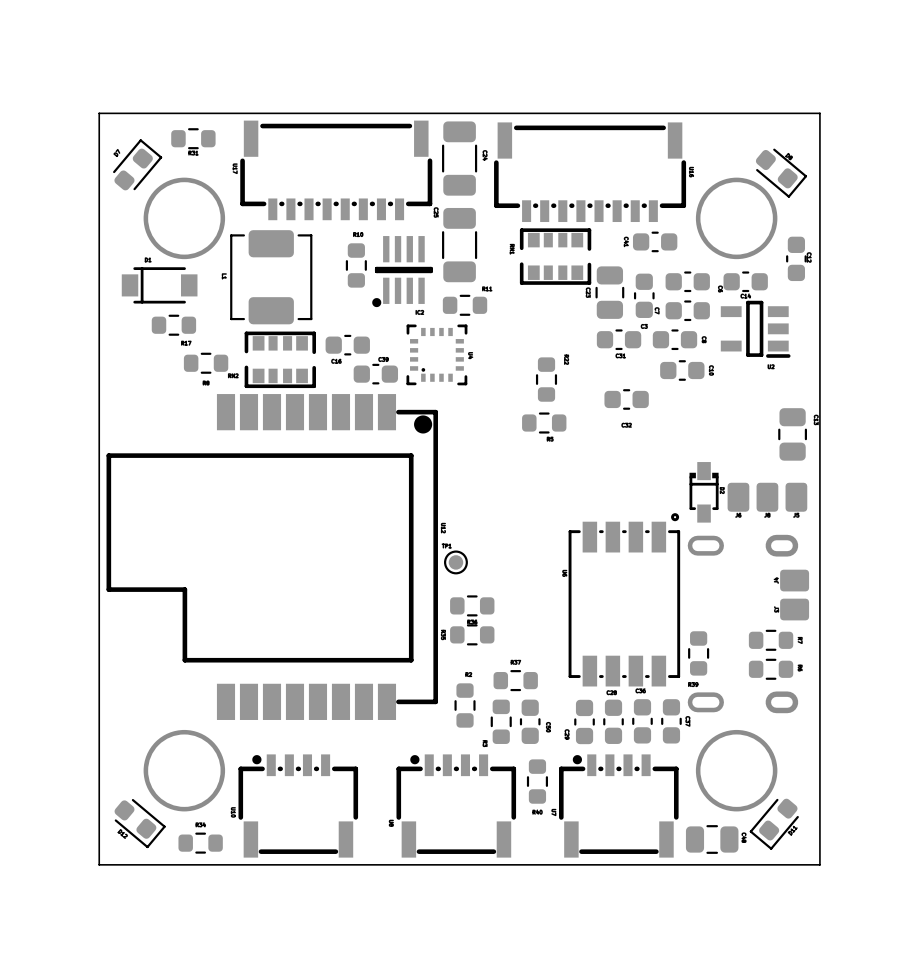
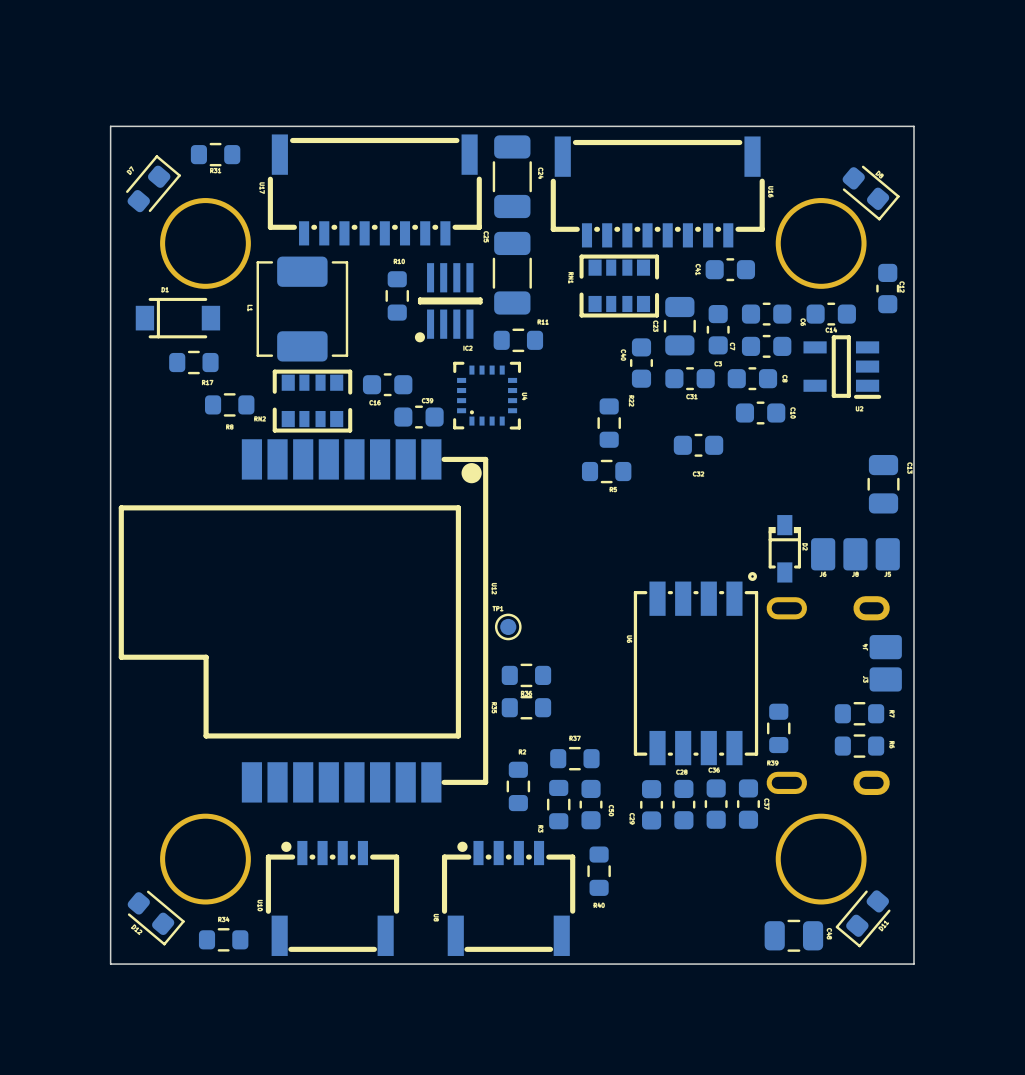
part: none -> (641, 363)
part: (618, 806) -> none

